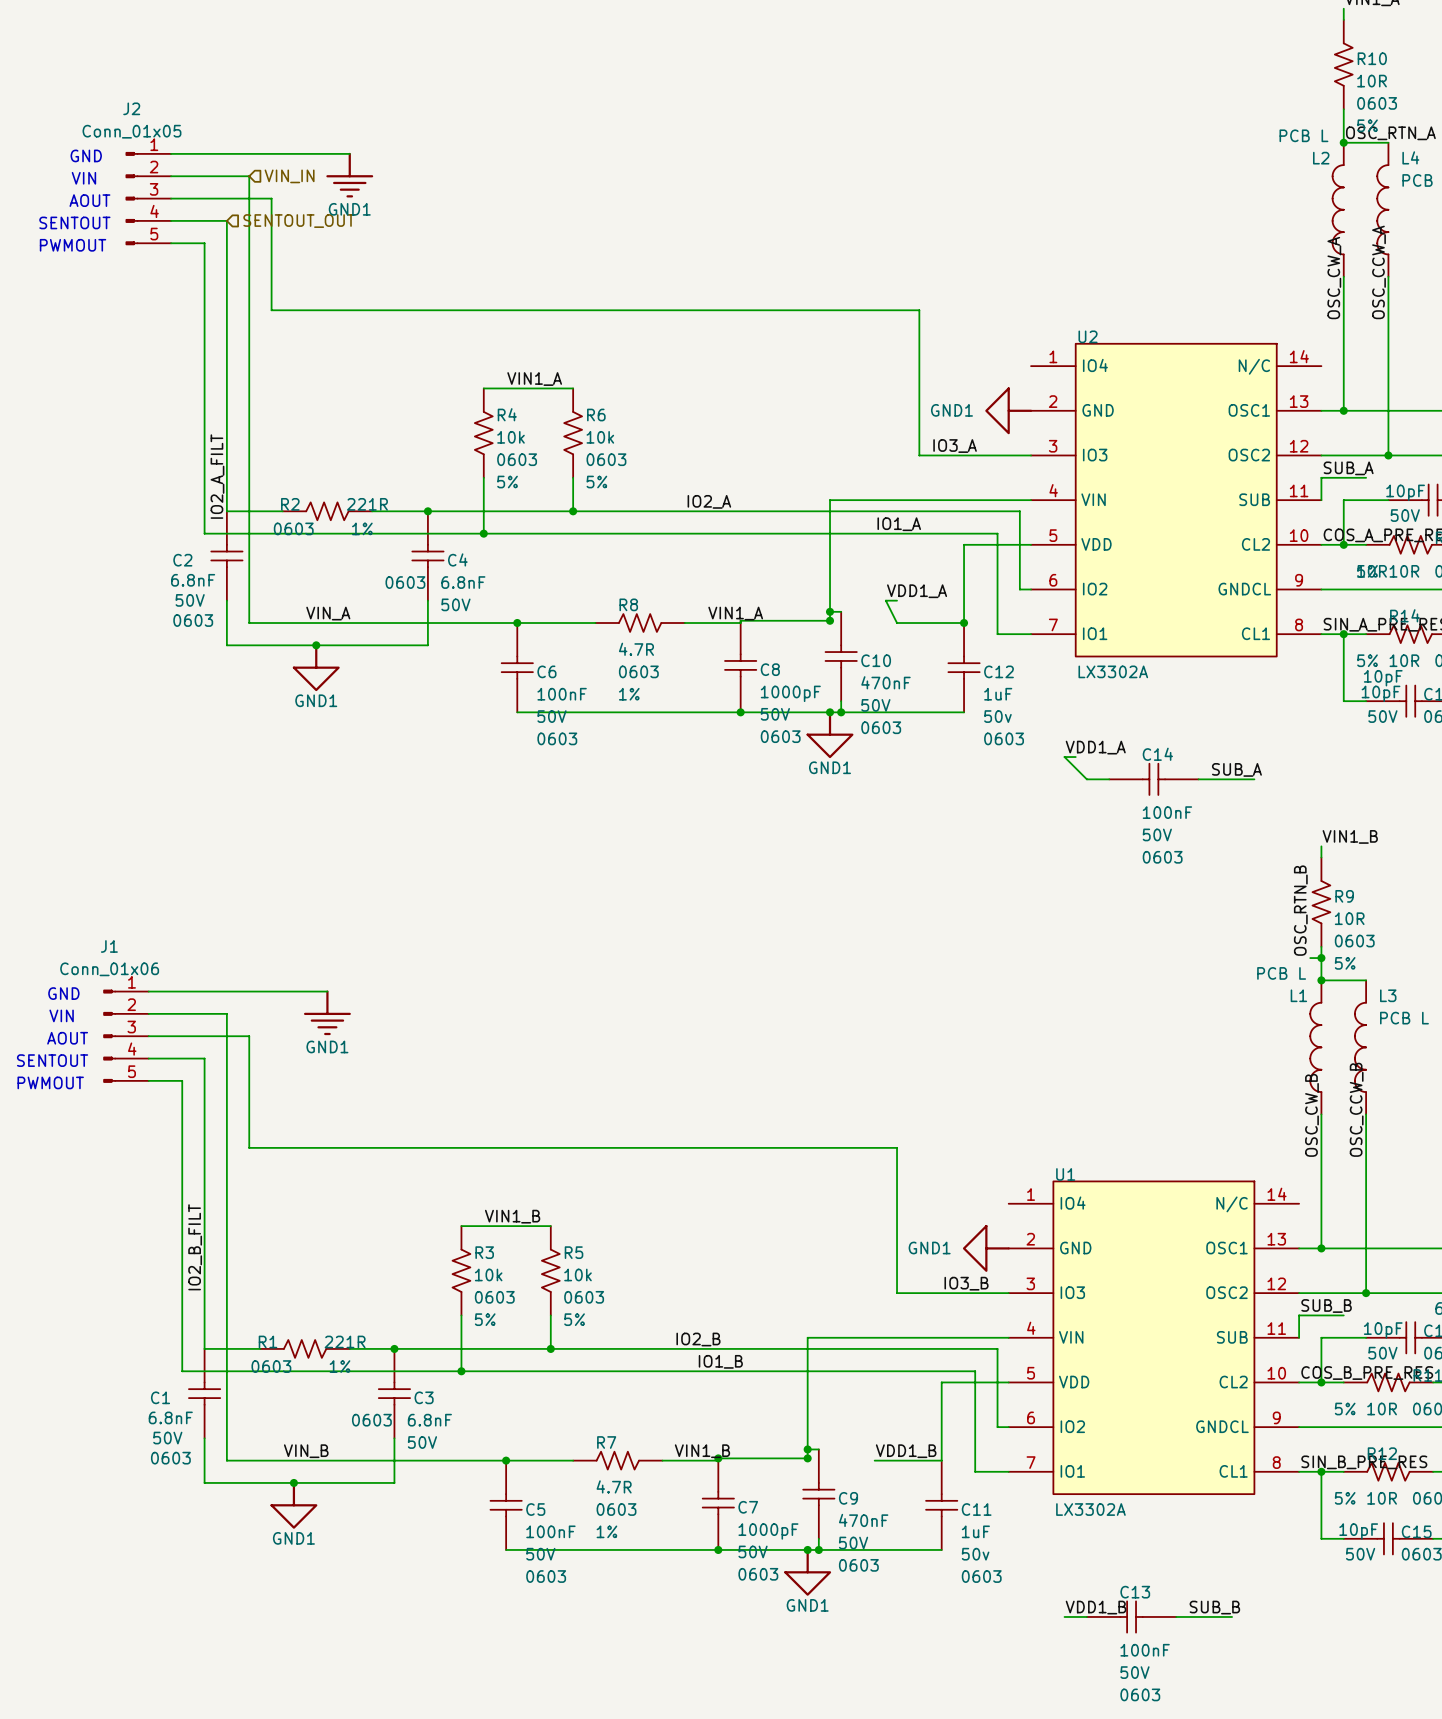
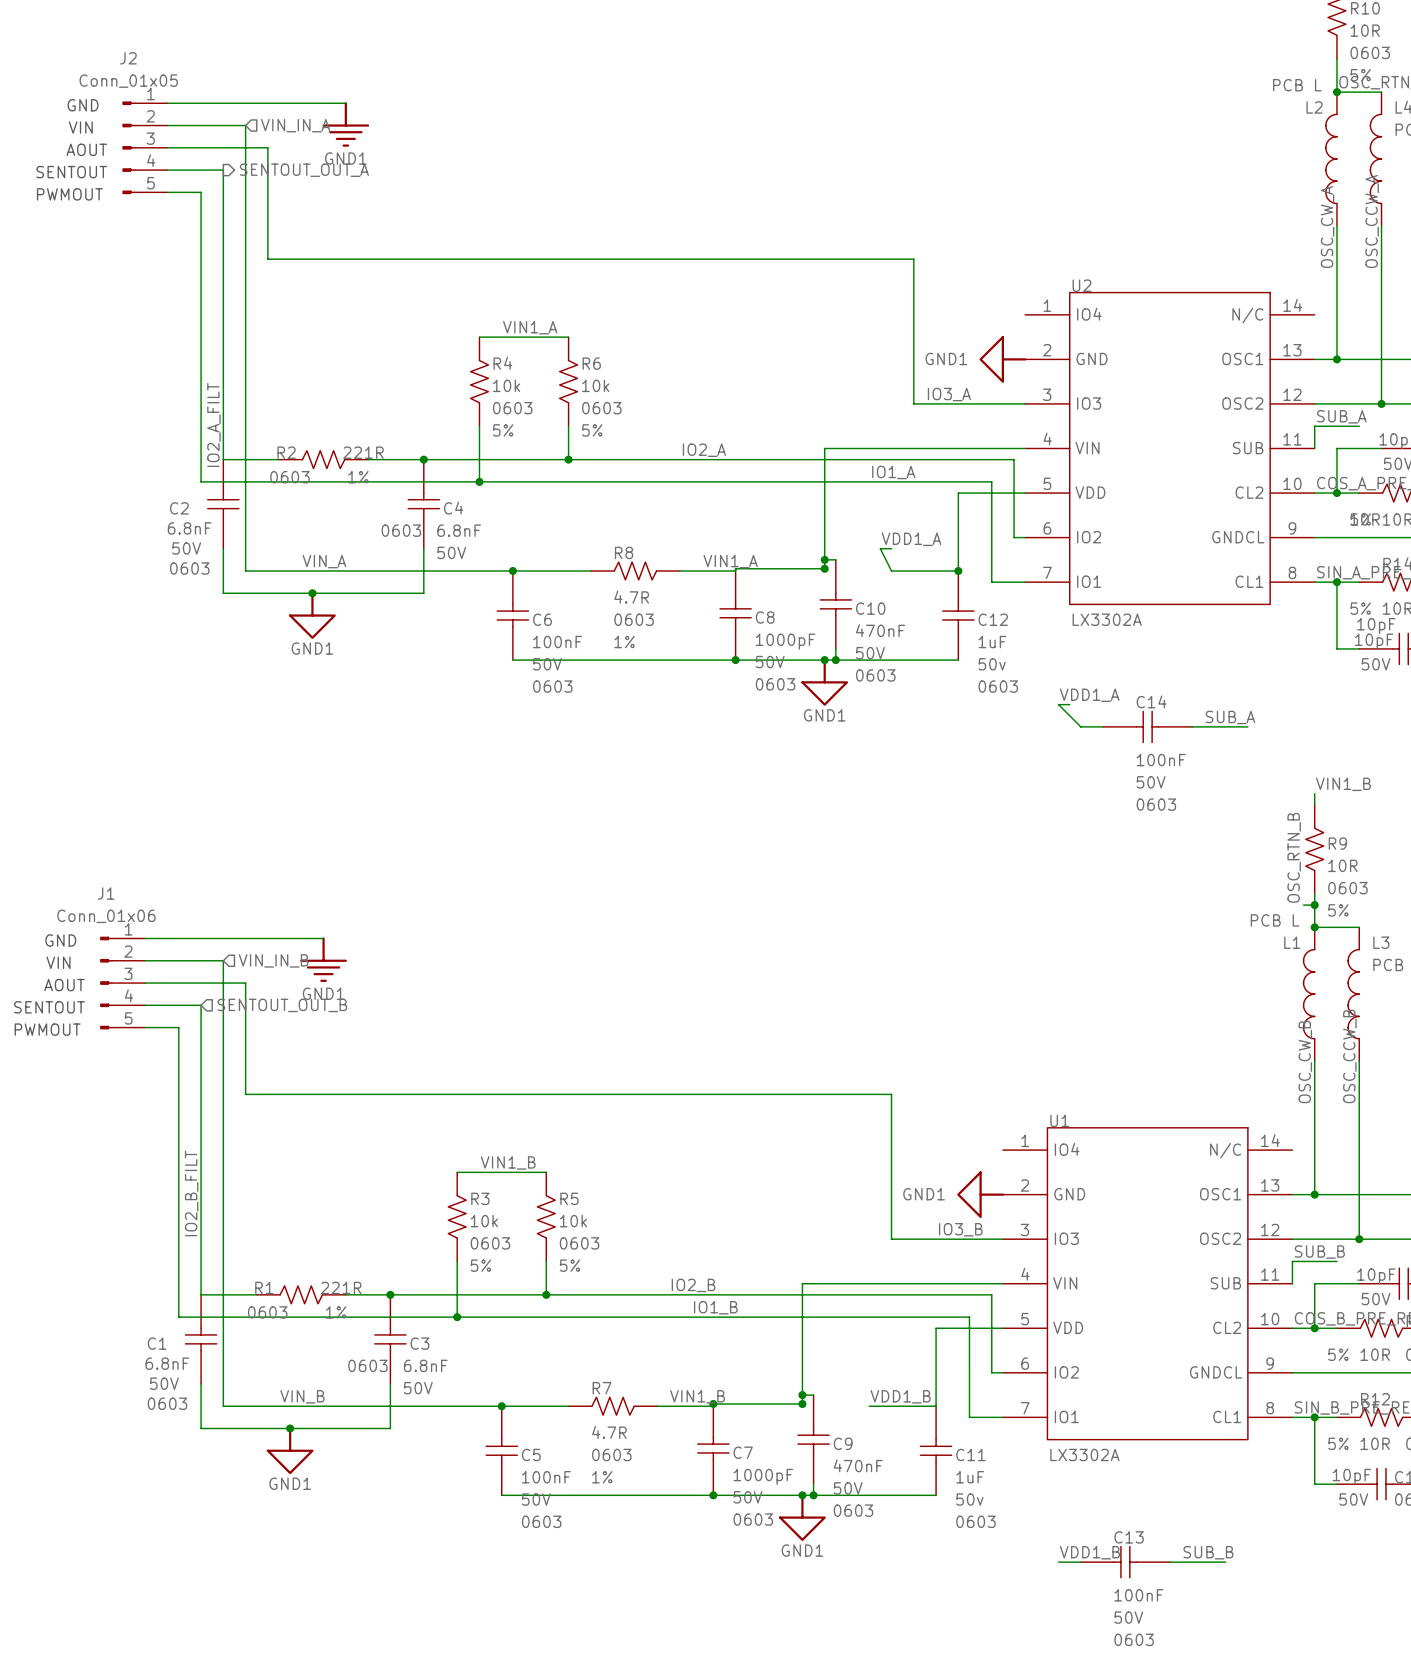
hierarchical label: VIN_IN (289, 176) -> VIN_IN_A (295, 125)
hierarchical label shape: input (299, 221) -> output (304, 170)
hierarchical label: SENTOUT_OUT (299, 221) -> SENTOUT_OUT_A (304, 170)
hierarchical label: none -> VIN_IN_B (273, 960)
hierarchical label: none -> SENTOUT_OUT_B (282, 1005)

